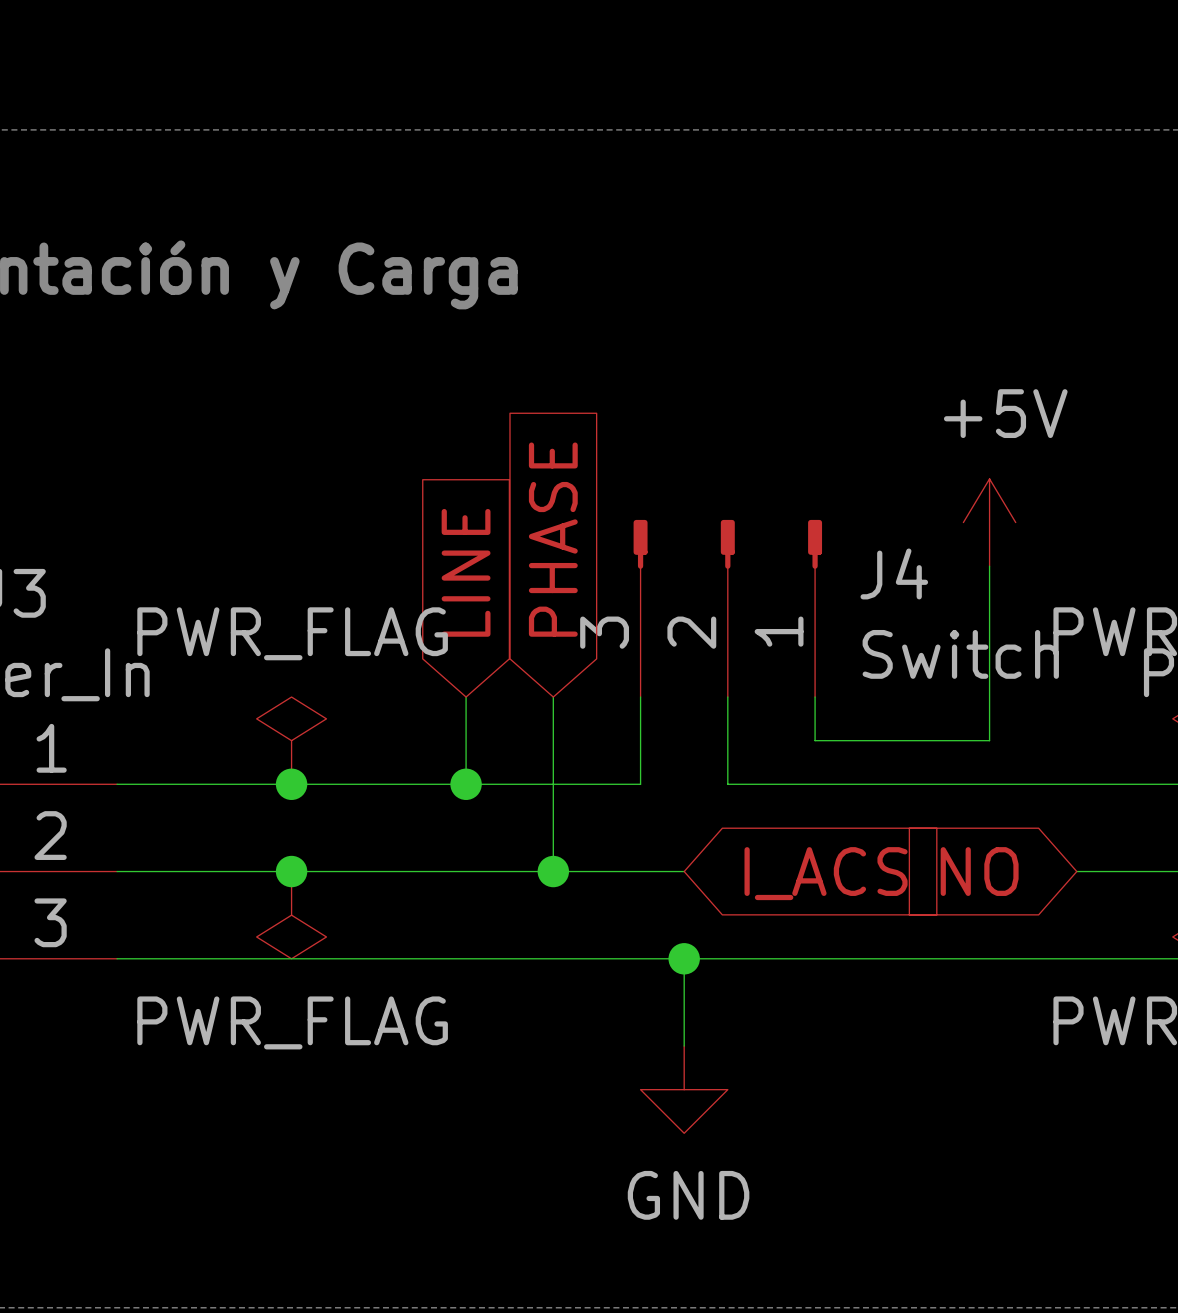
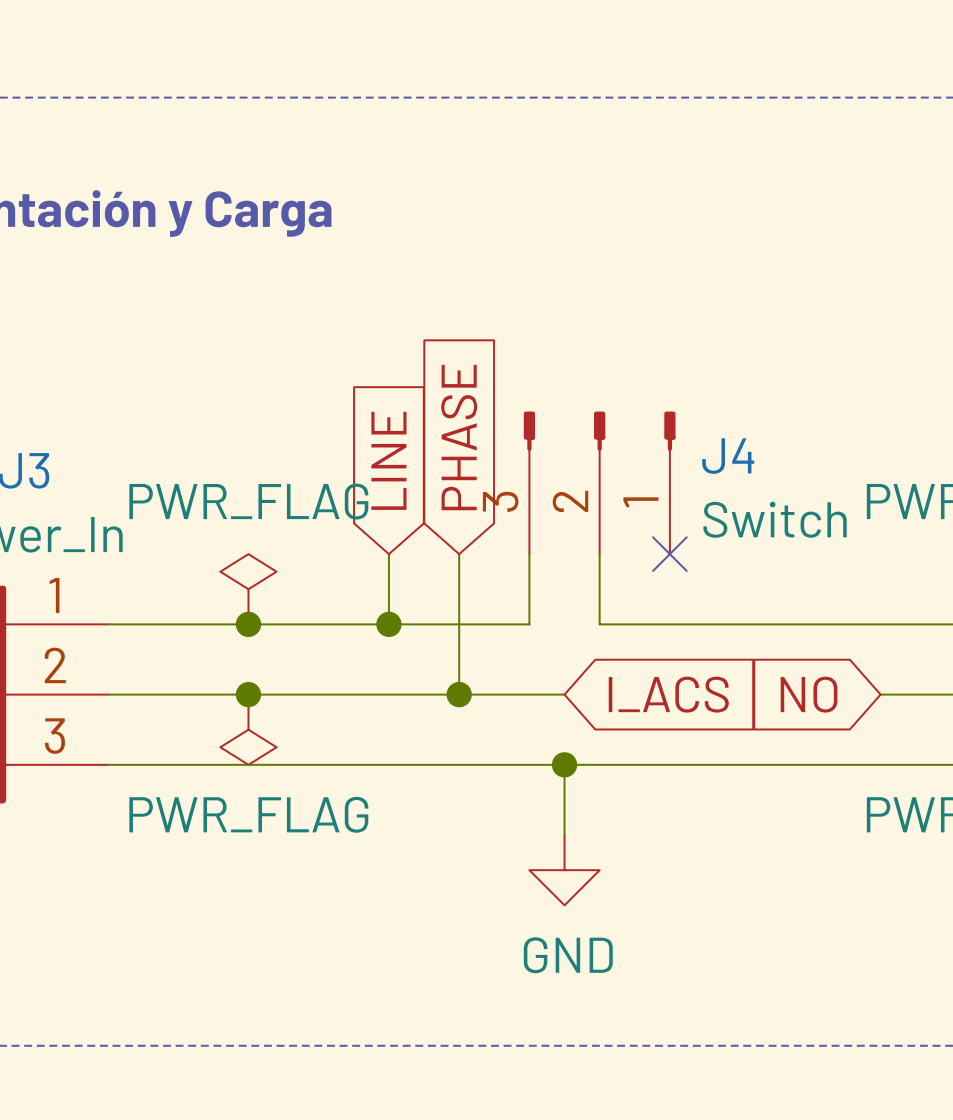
power symbol: +5V (989, 522) -> none
wire: (989, 566) (989, 740) (815, 740) (815, 697) -> none
no-connect mark: none -> (669, 554)

